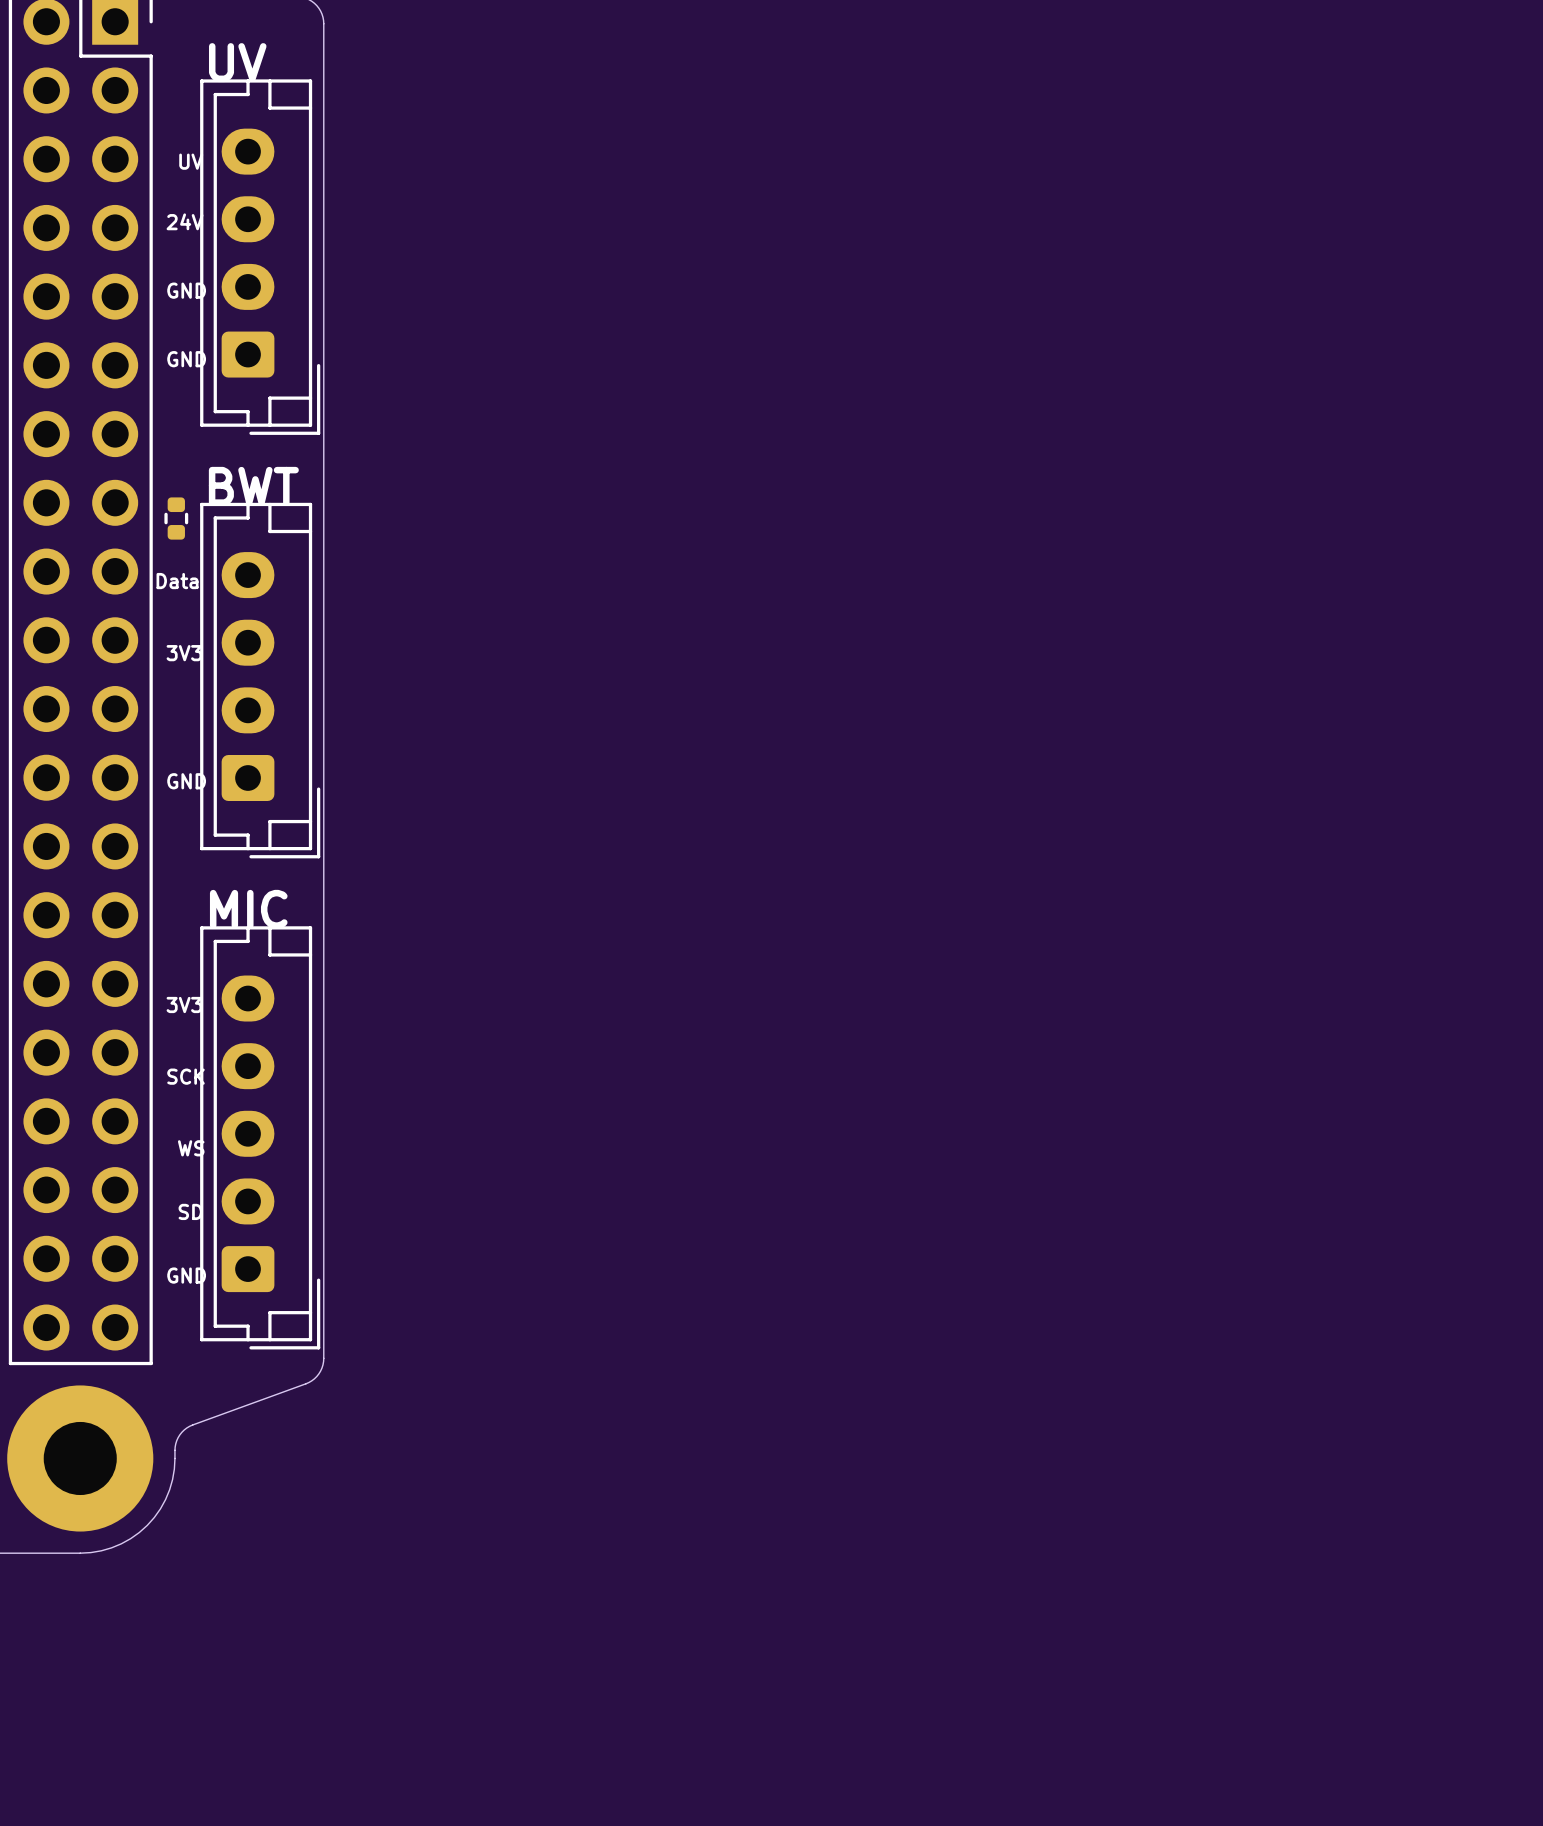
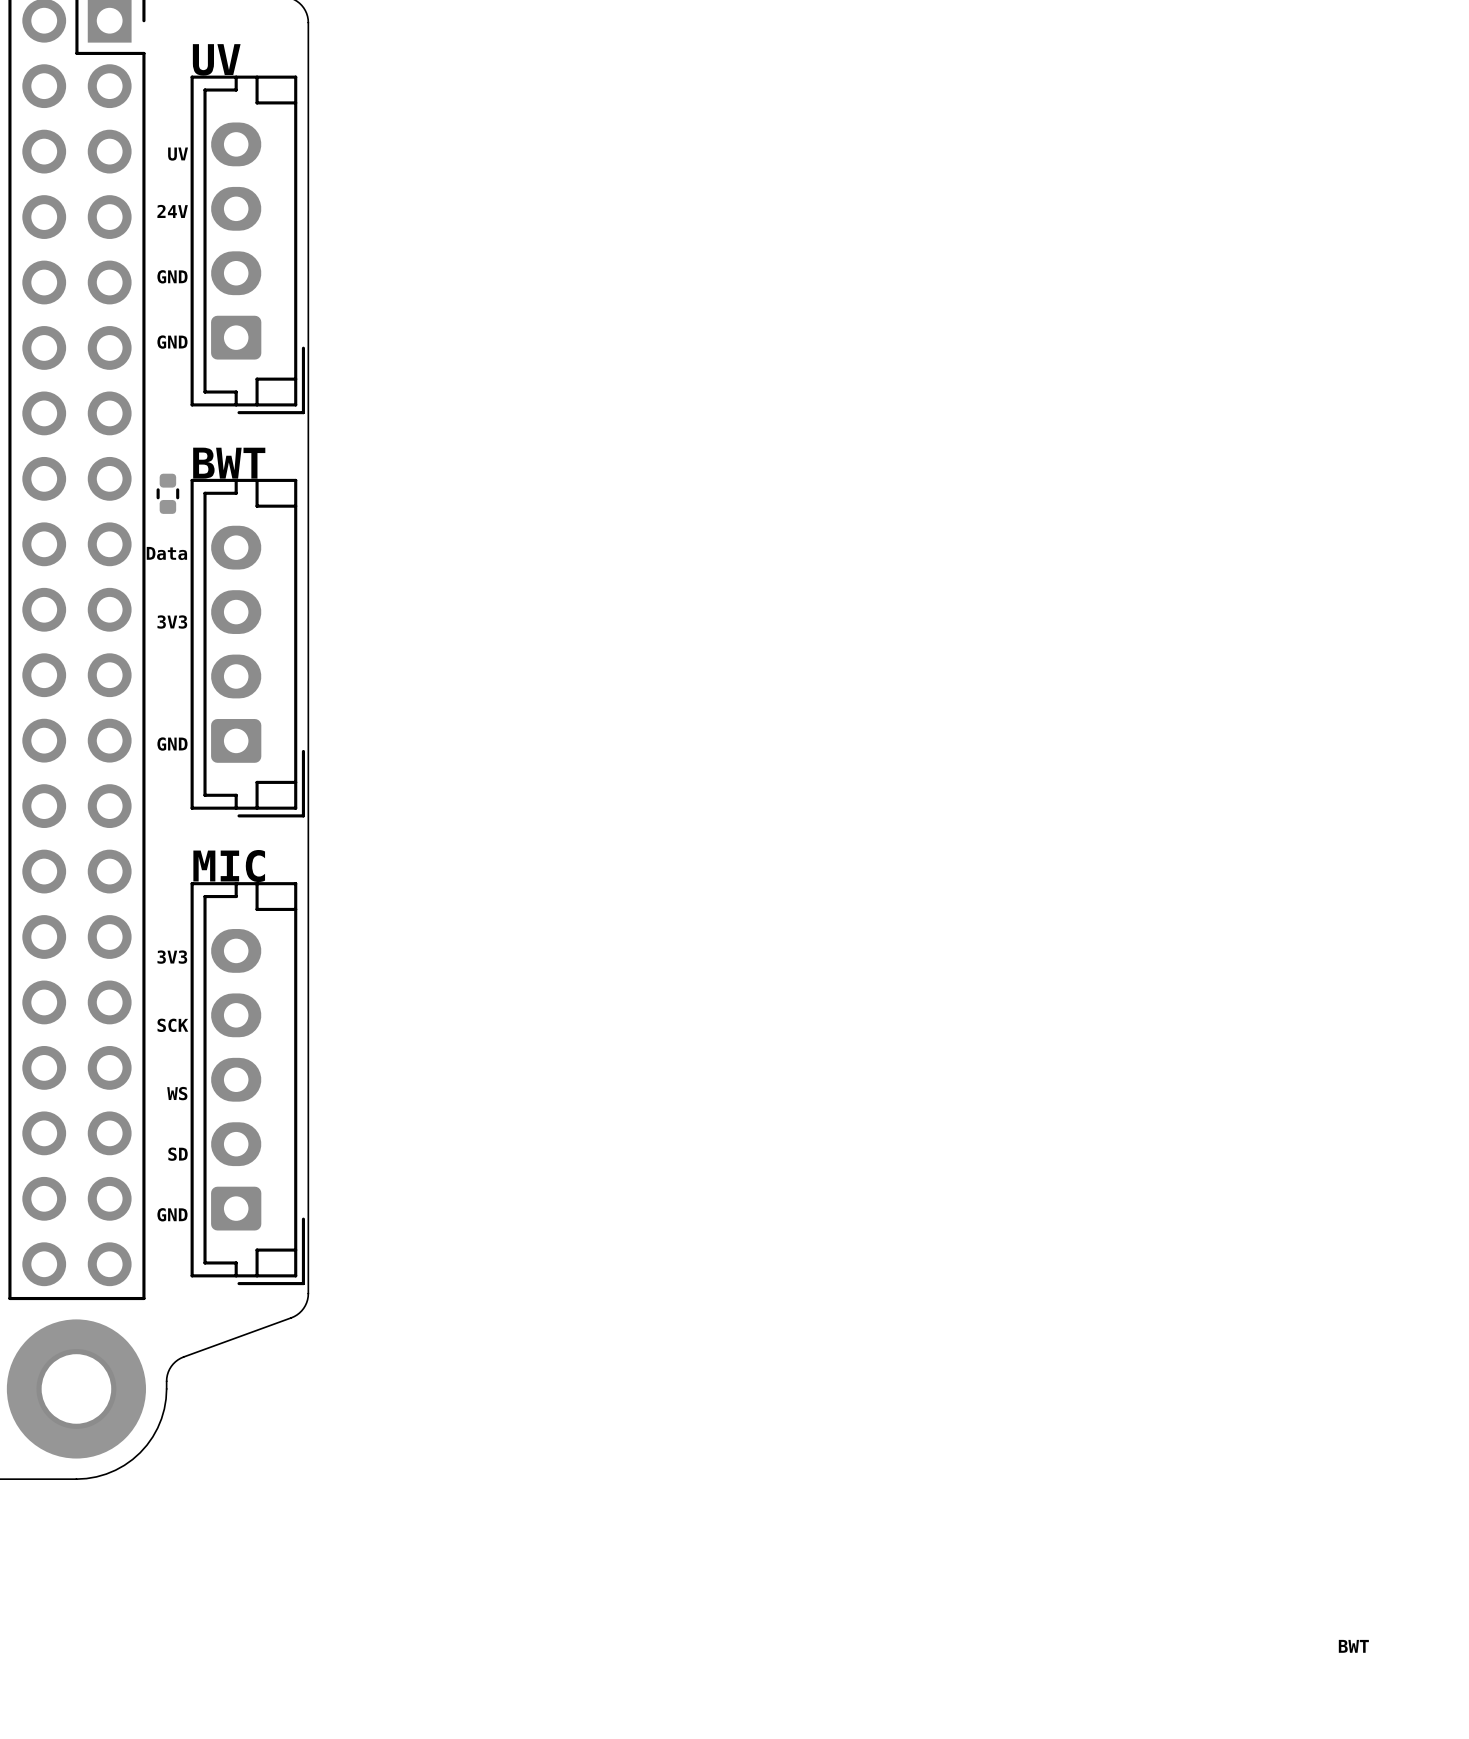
text: none -> BWT (1353, 1646)

